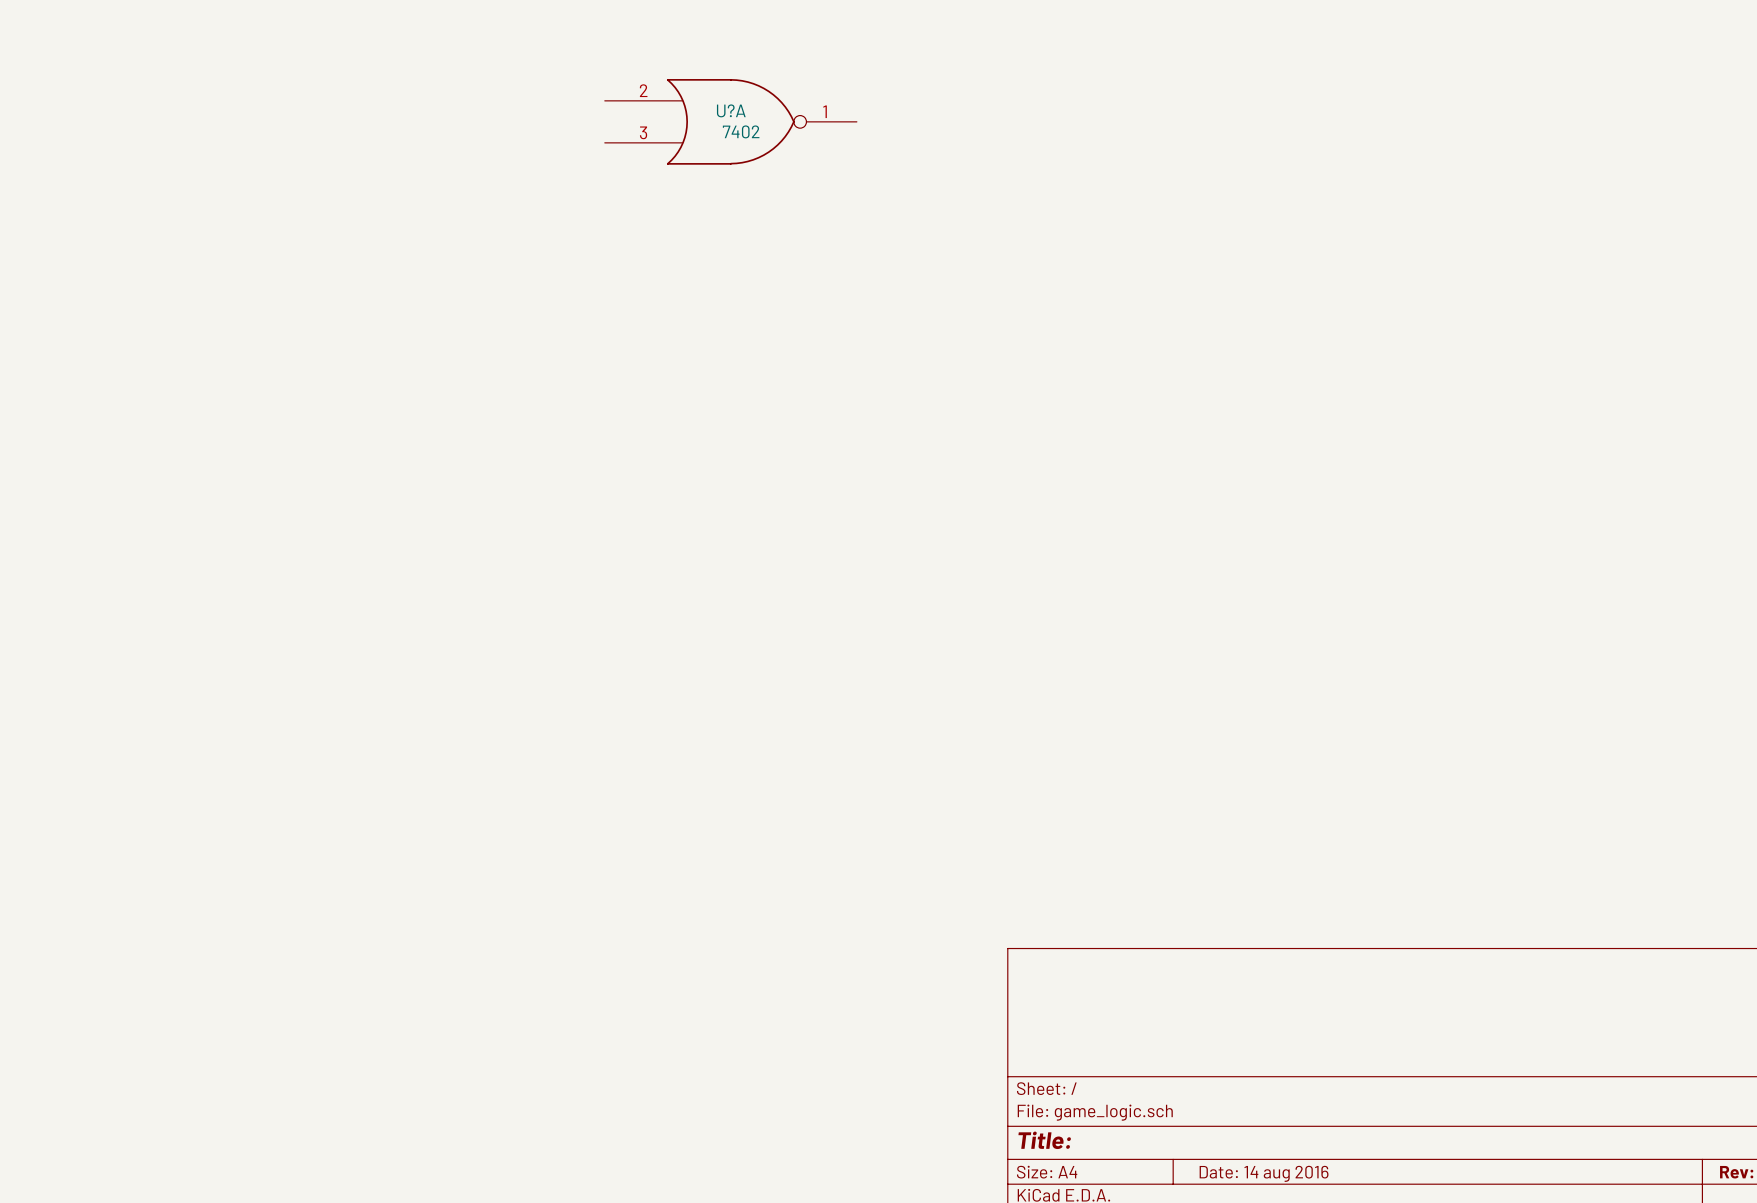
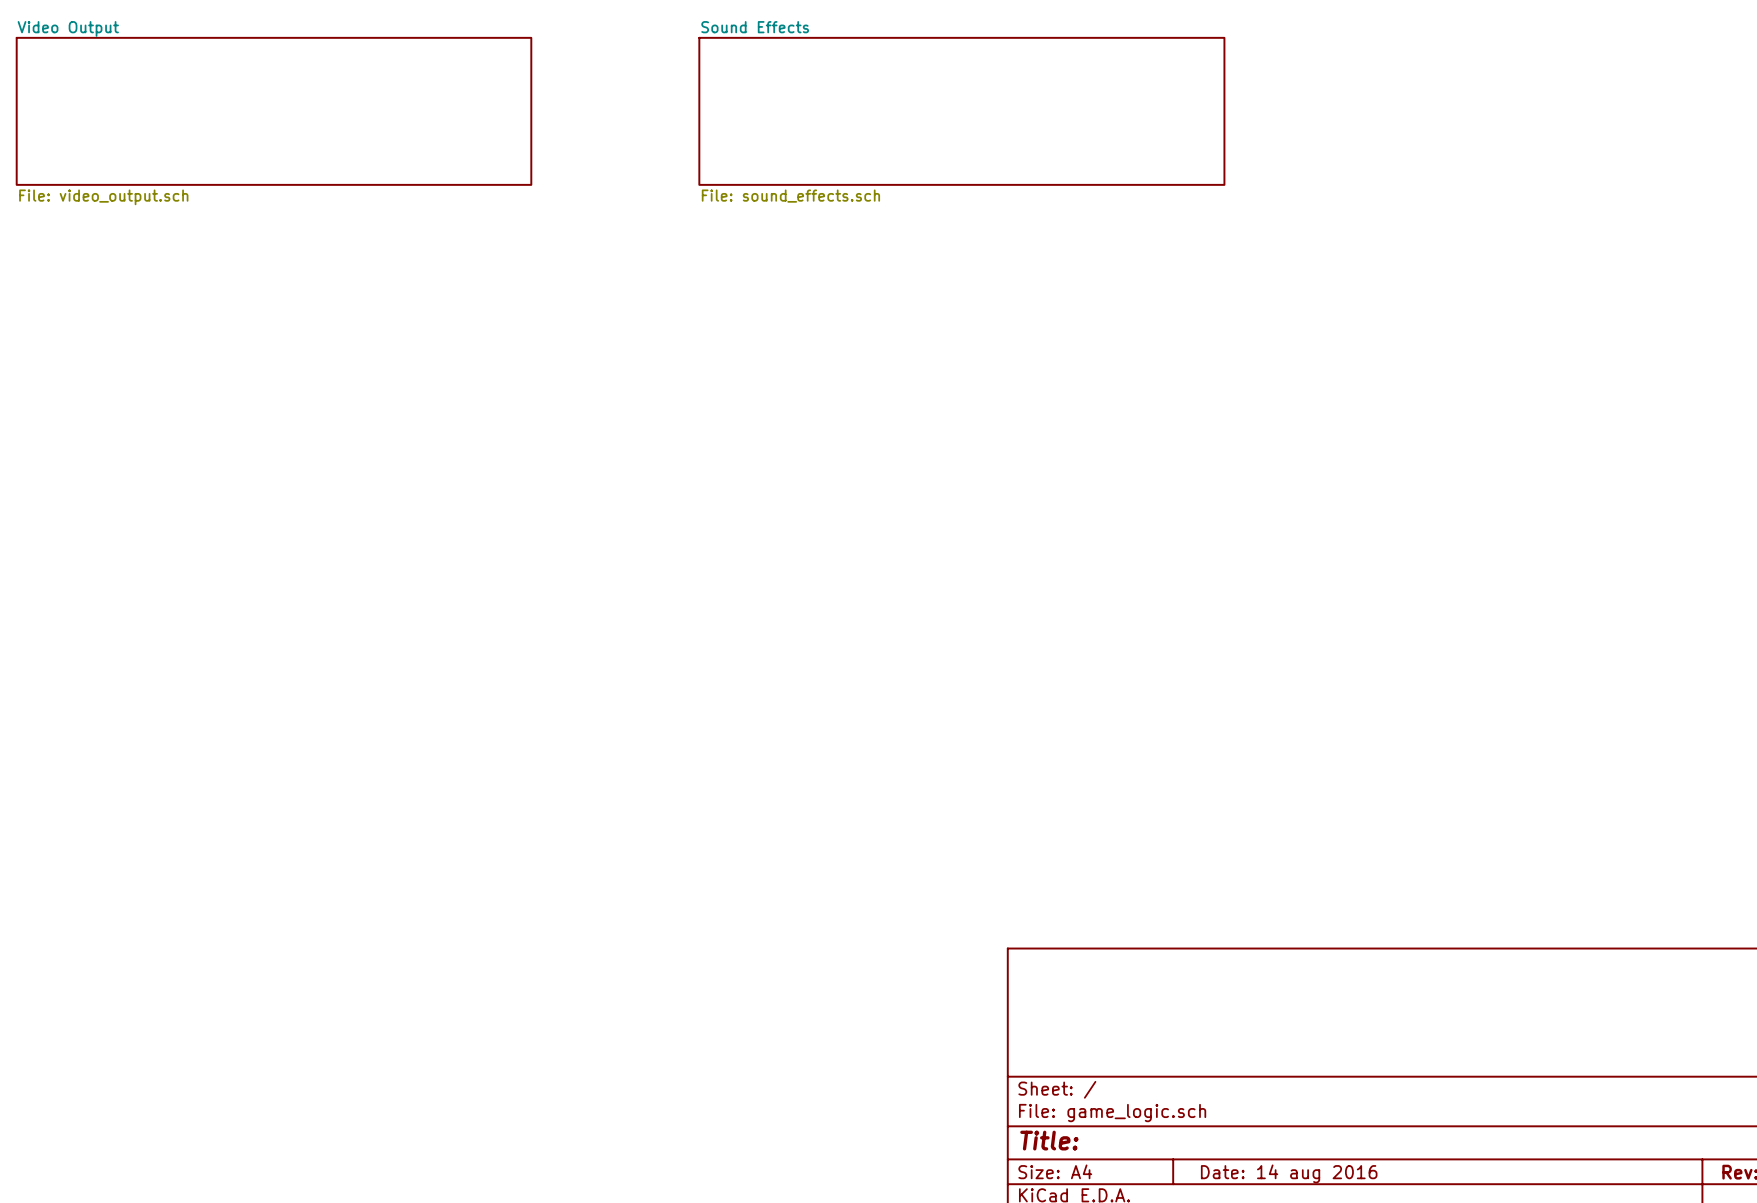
sheet Video Output: none -> File: video_output.sch (274, 111)
sheet Sound Effects: none -> File: sound_effects.sch (961, 111)
U?A: 7402 (730, 121) -> none

